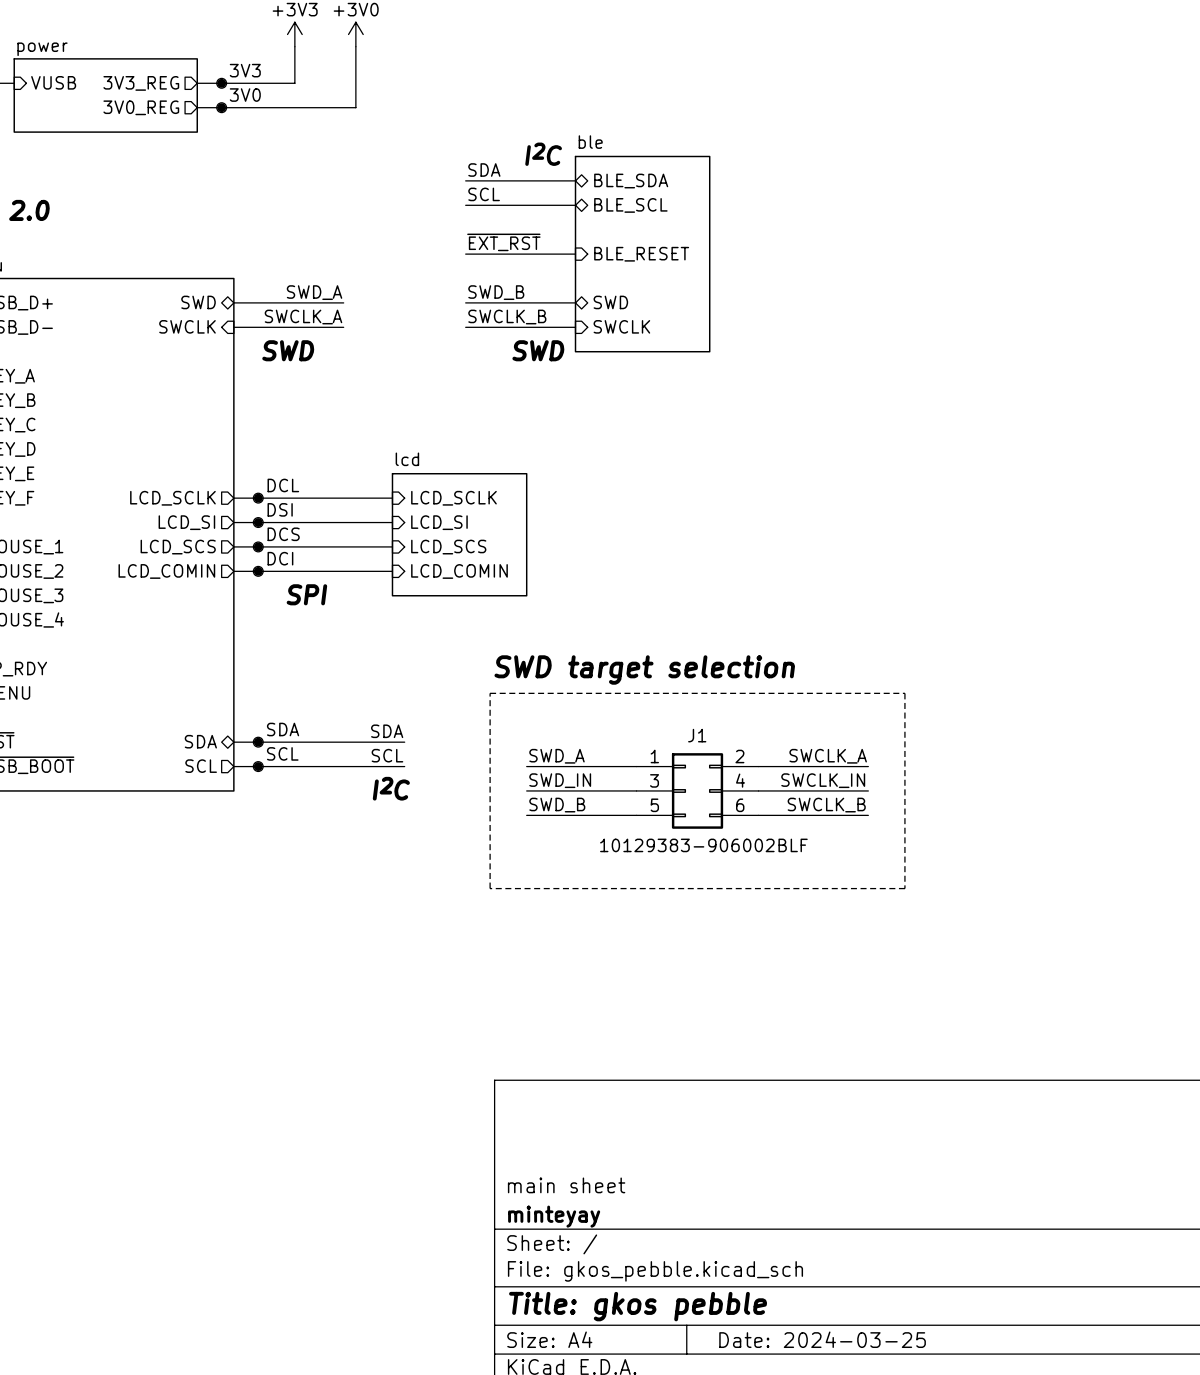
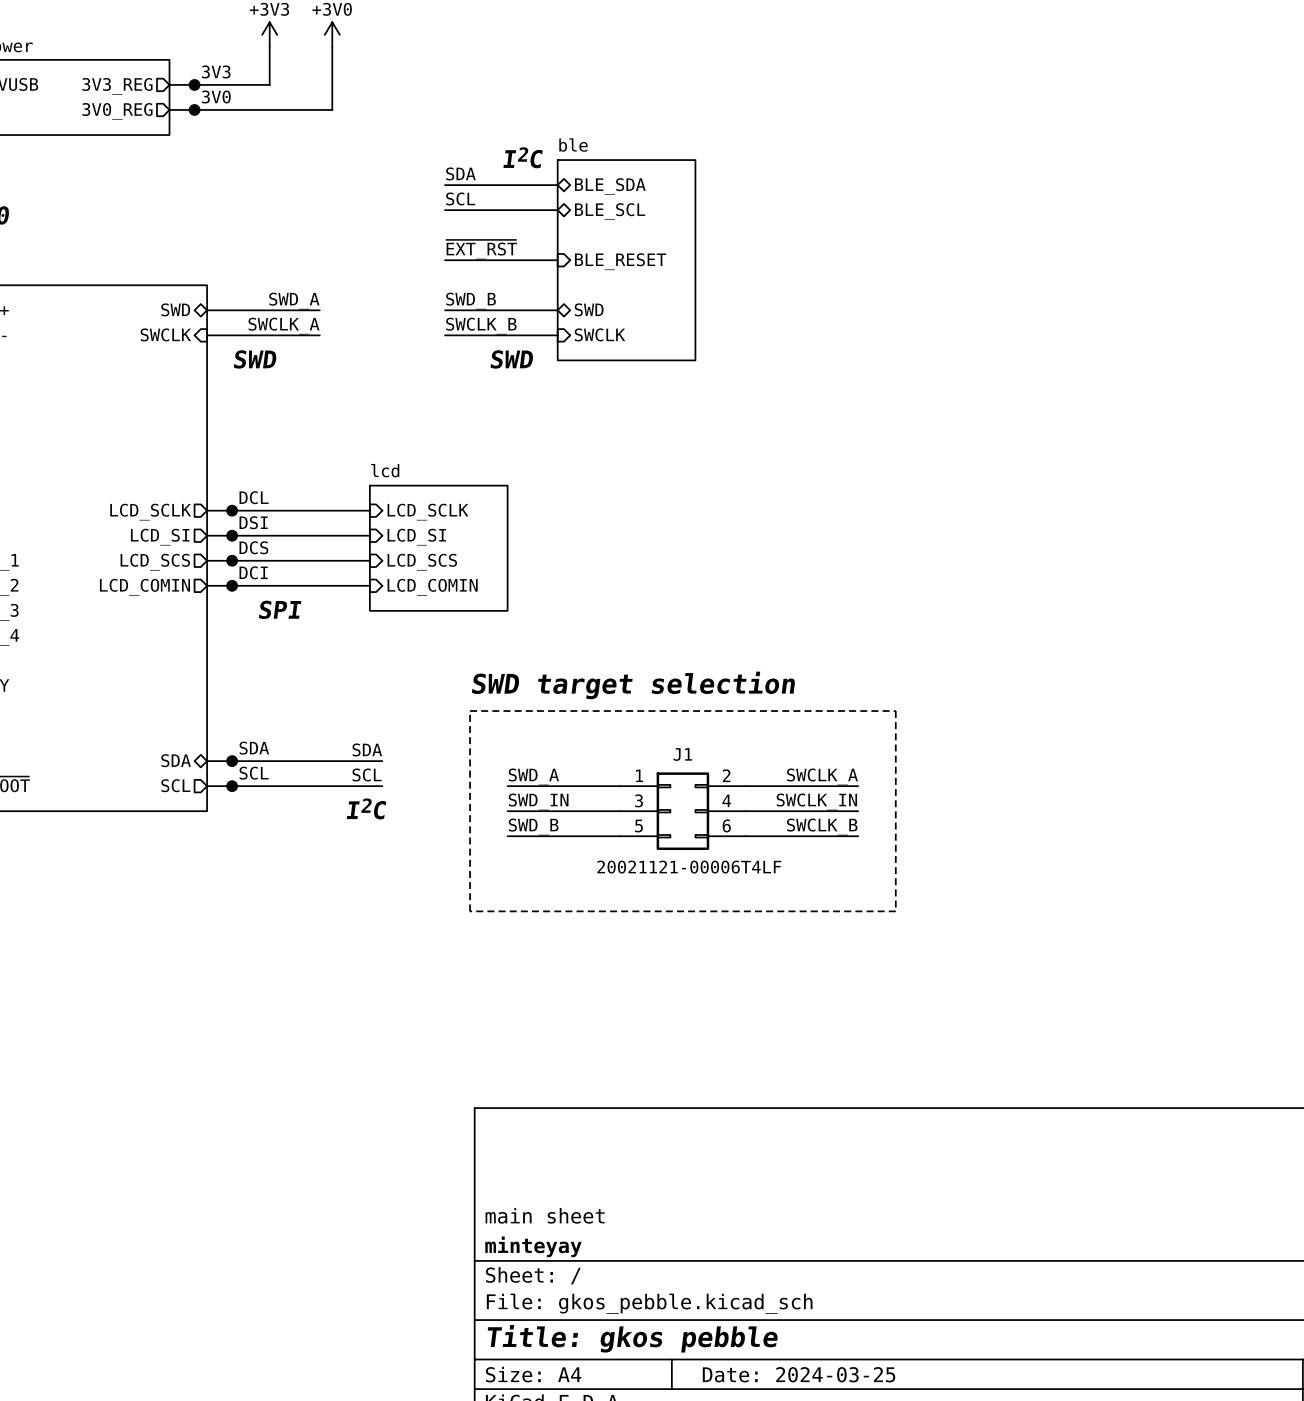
J1 value: 10129383-906002BLF (703, 845) -> 20021121-00006T4LF (689, 867)

